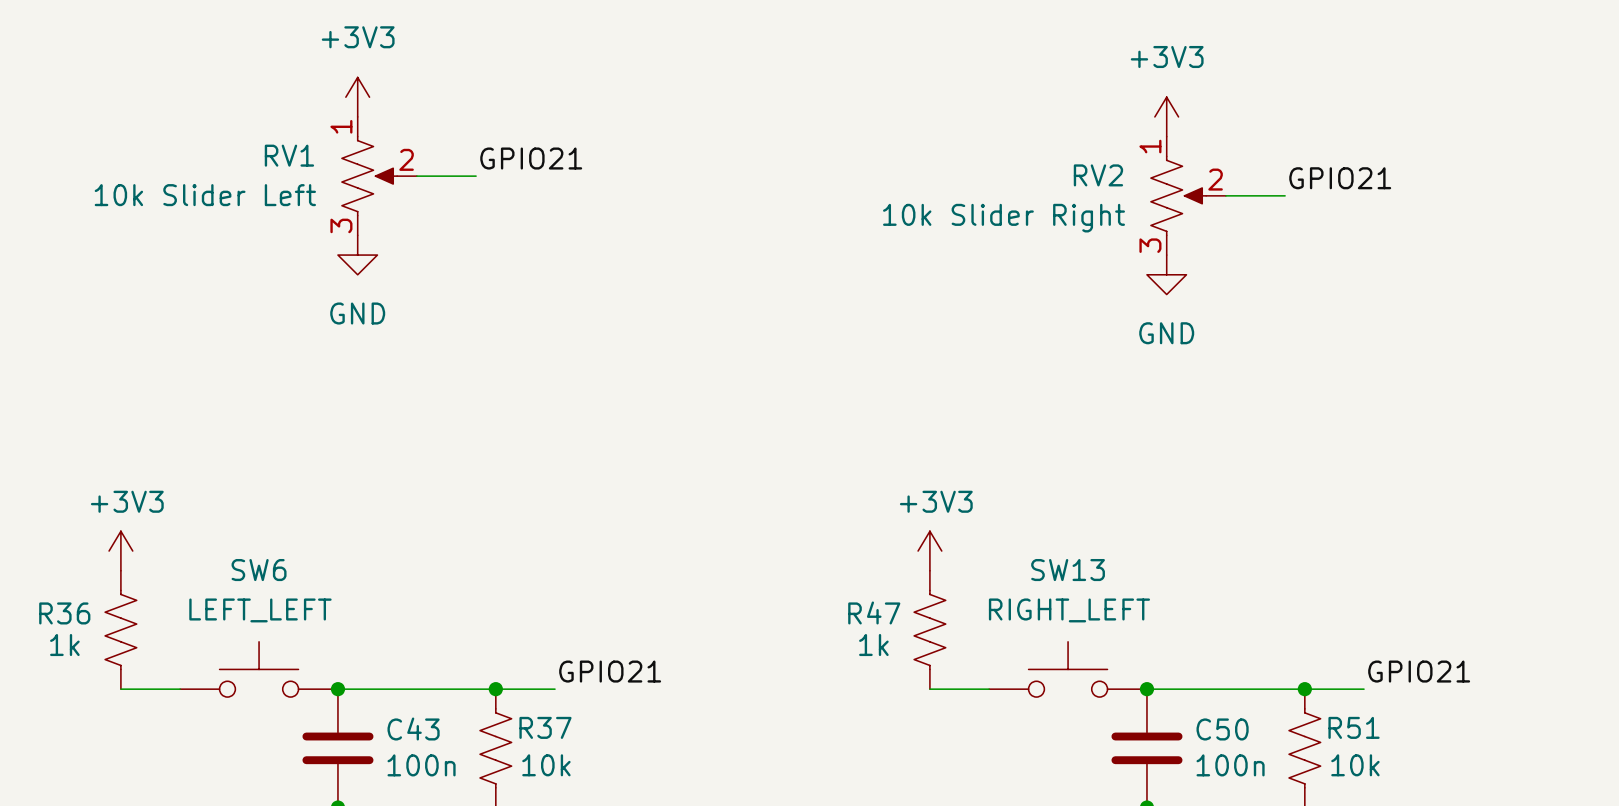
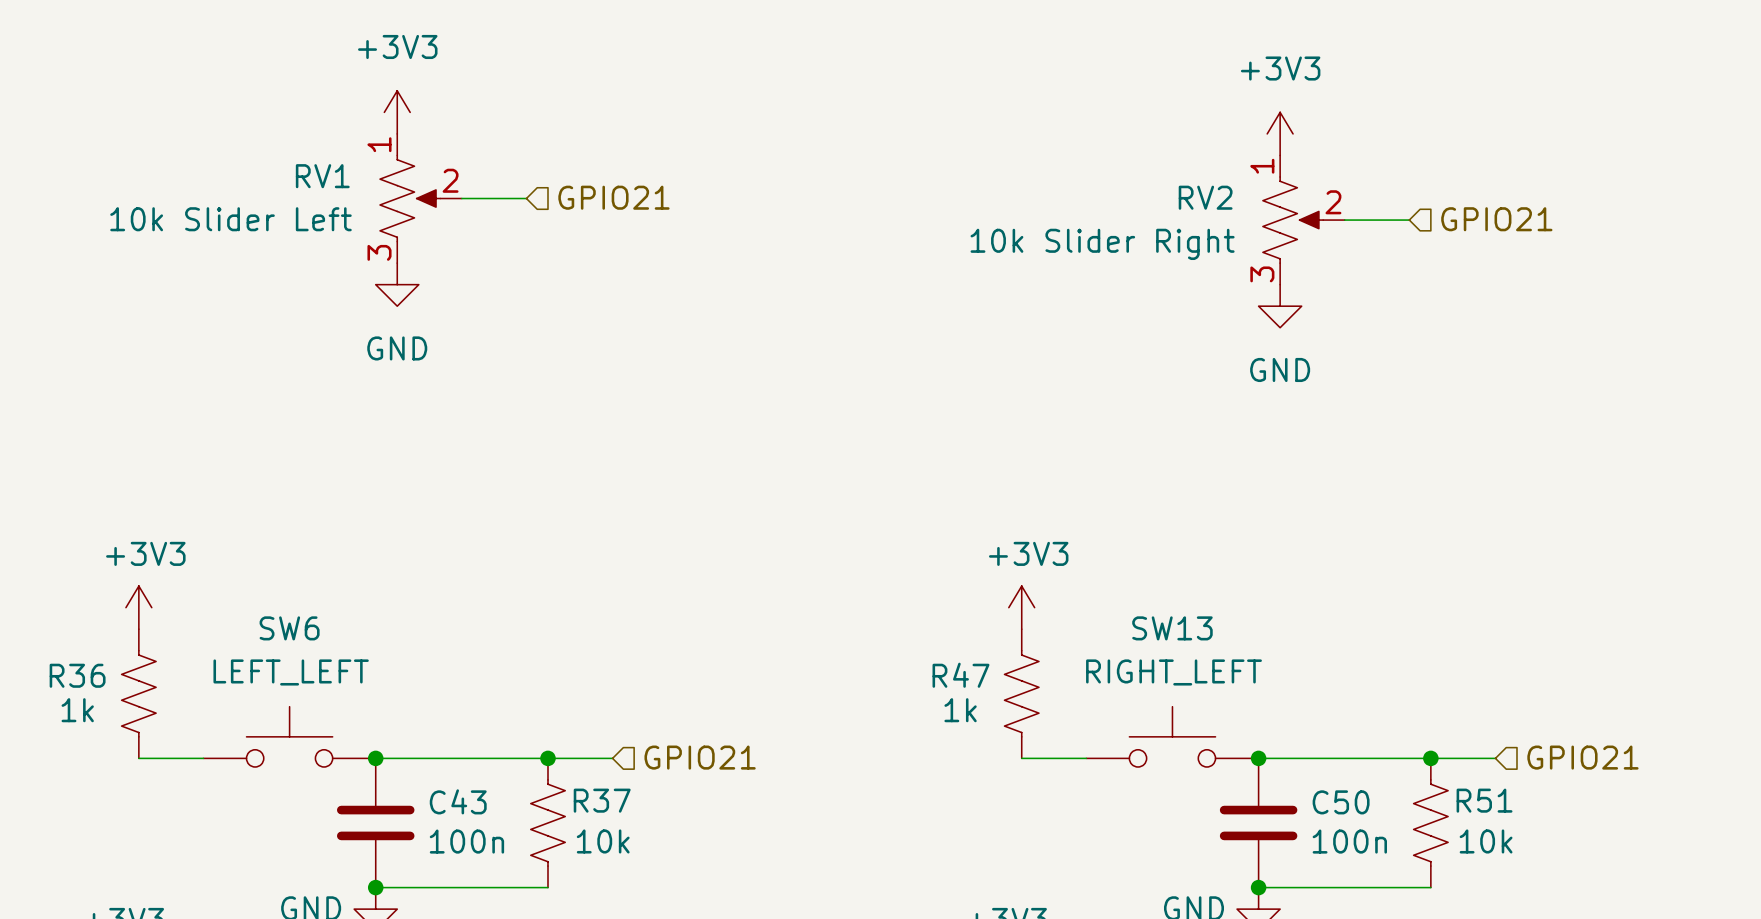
label: GPIO21 (531, 158) -> none
hierarchical label: none -> GPIO21 (613, 197)
label: GPIO21 (1340, 178) -> none
hierarchical label: none -> GPIO21 (1496, 219)
label: GPIO21 (610, 671) -> none
label: GPIO21 (1419, 671) -> none
hierarchical label: none -> GPIO21 (700, 757)
hierarchical label: none -> GPIO21 (1582, 757)

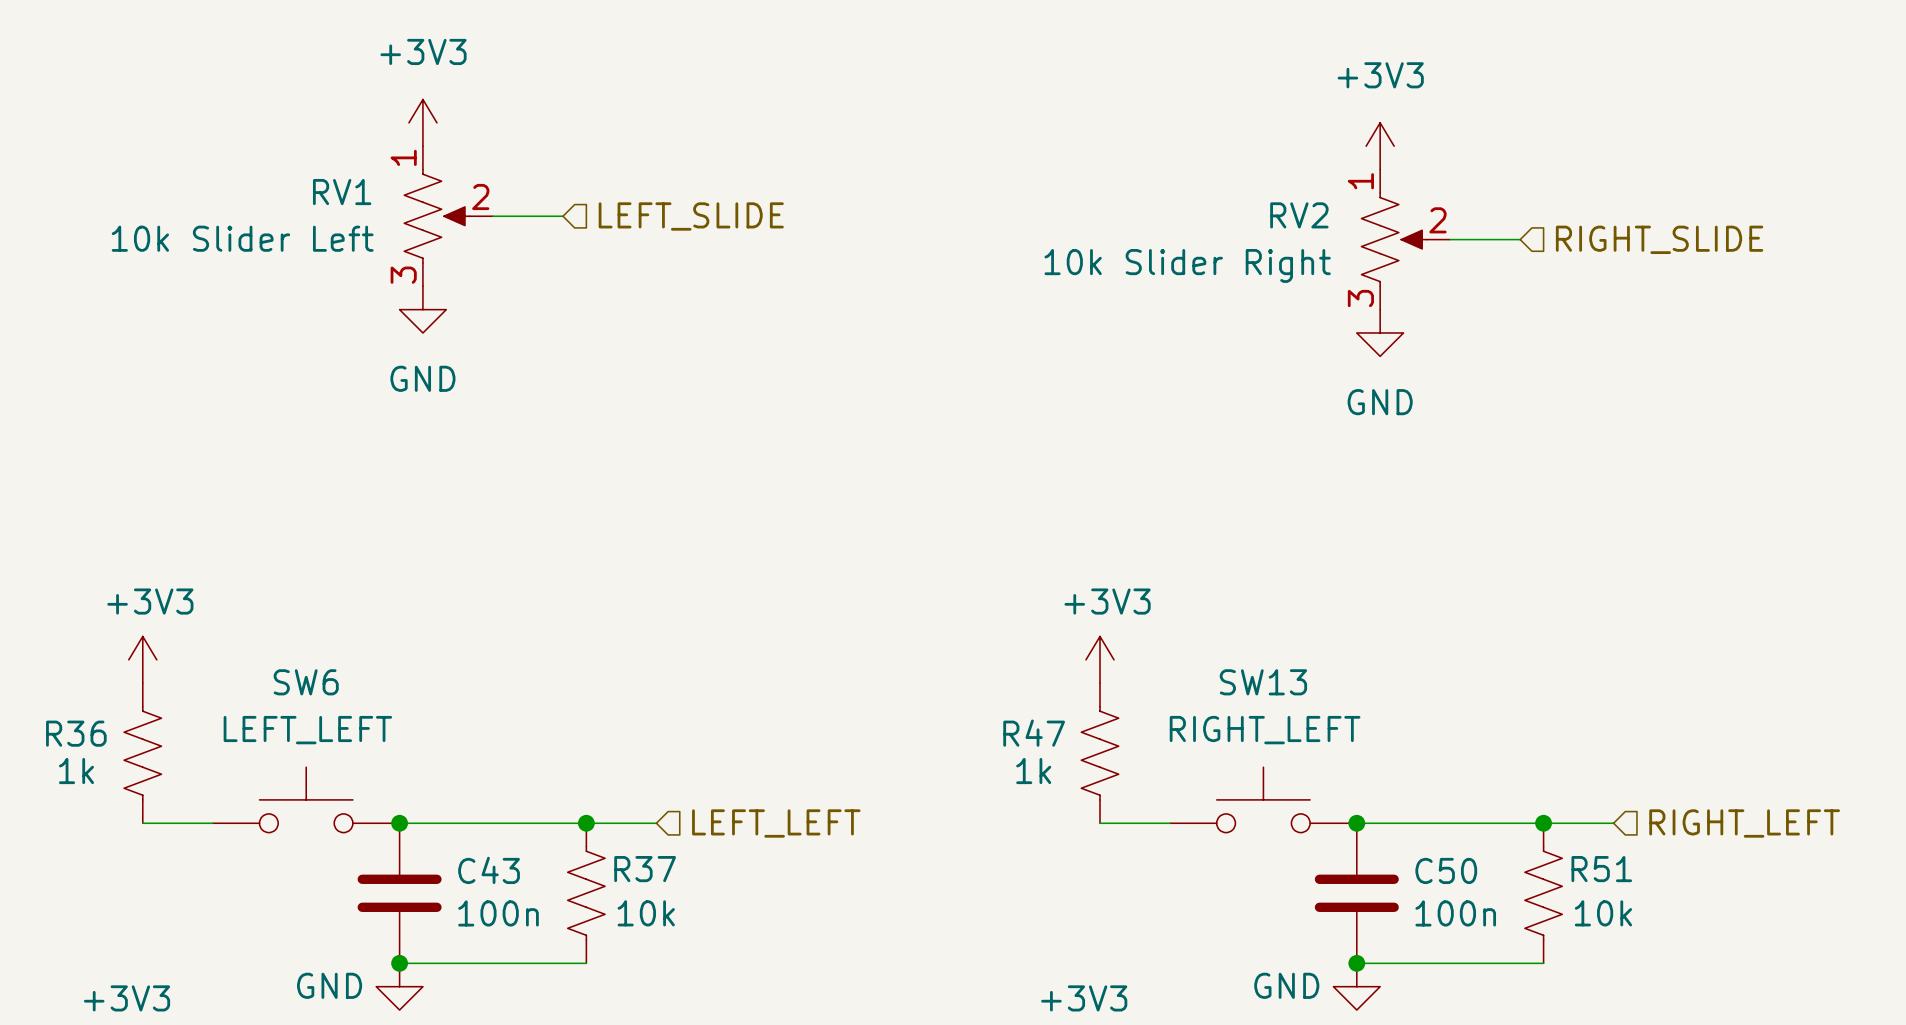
hierarchical label: GPIO21 (613, 197) -> LEFT_SLIDE (691, 216)
hierarchical label: GPIO21 (1496, 219) -> RIGHT_SLIDE (1659, 239)
hierarchical label: GPIO21 (700, 757) -> LEFT_LEFT (776, 823)
hierarchical label: GPIO21 (1582, 757) -> RIGHT_LEFT (1744, 823)

